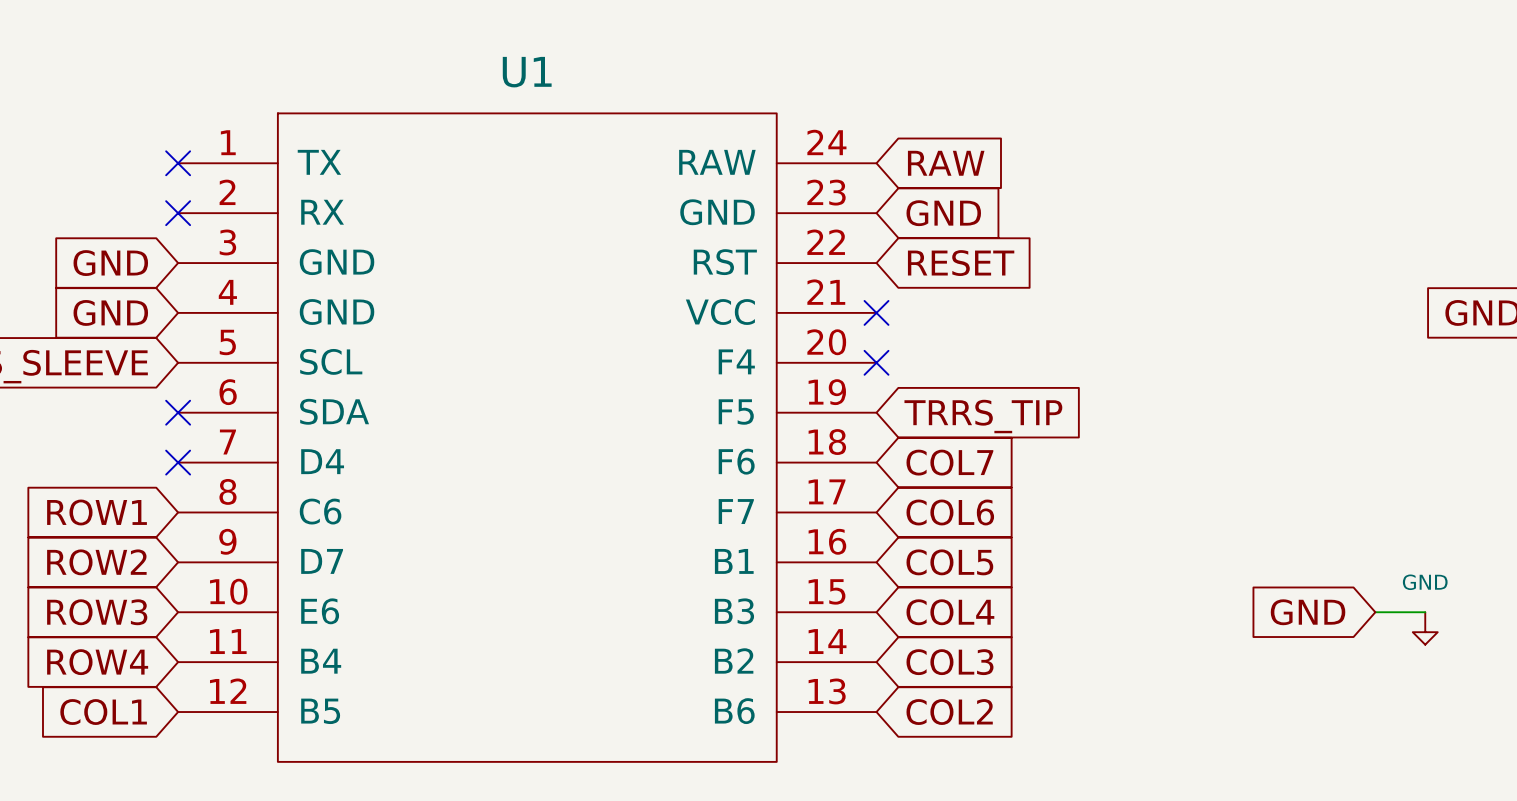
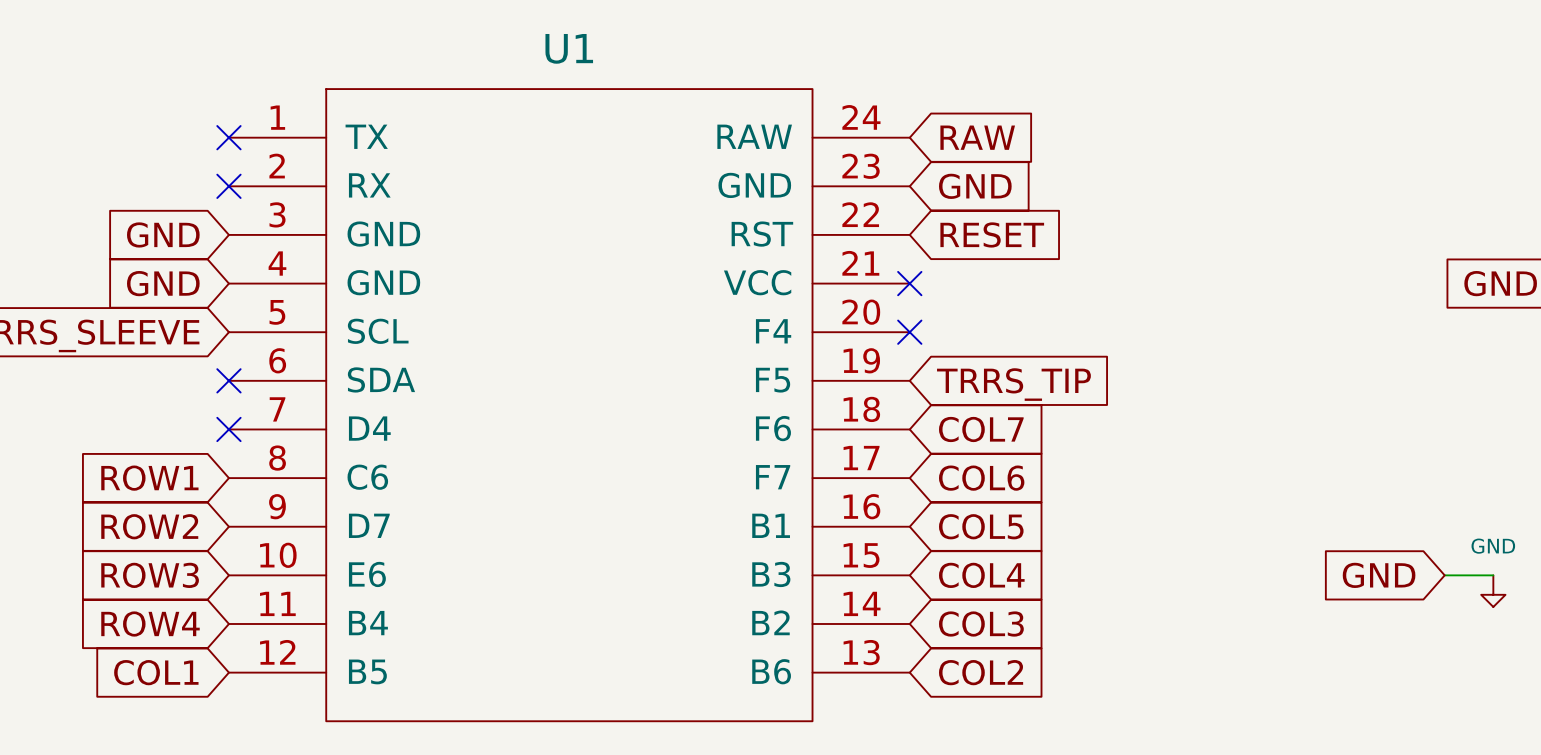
global label position: GND (1308, 612) -> GND (1379, 575)
wire: (1375, 612) (1425, 612) -> (1493, 575) (1444, 575)
power symbol position: GND (1425, 628) -> GND (1493, 591)

